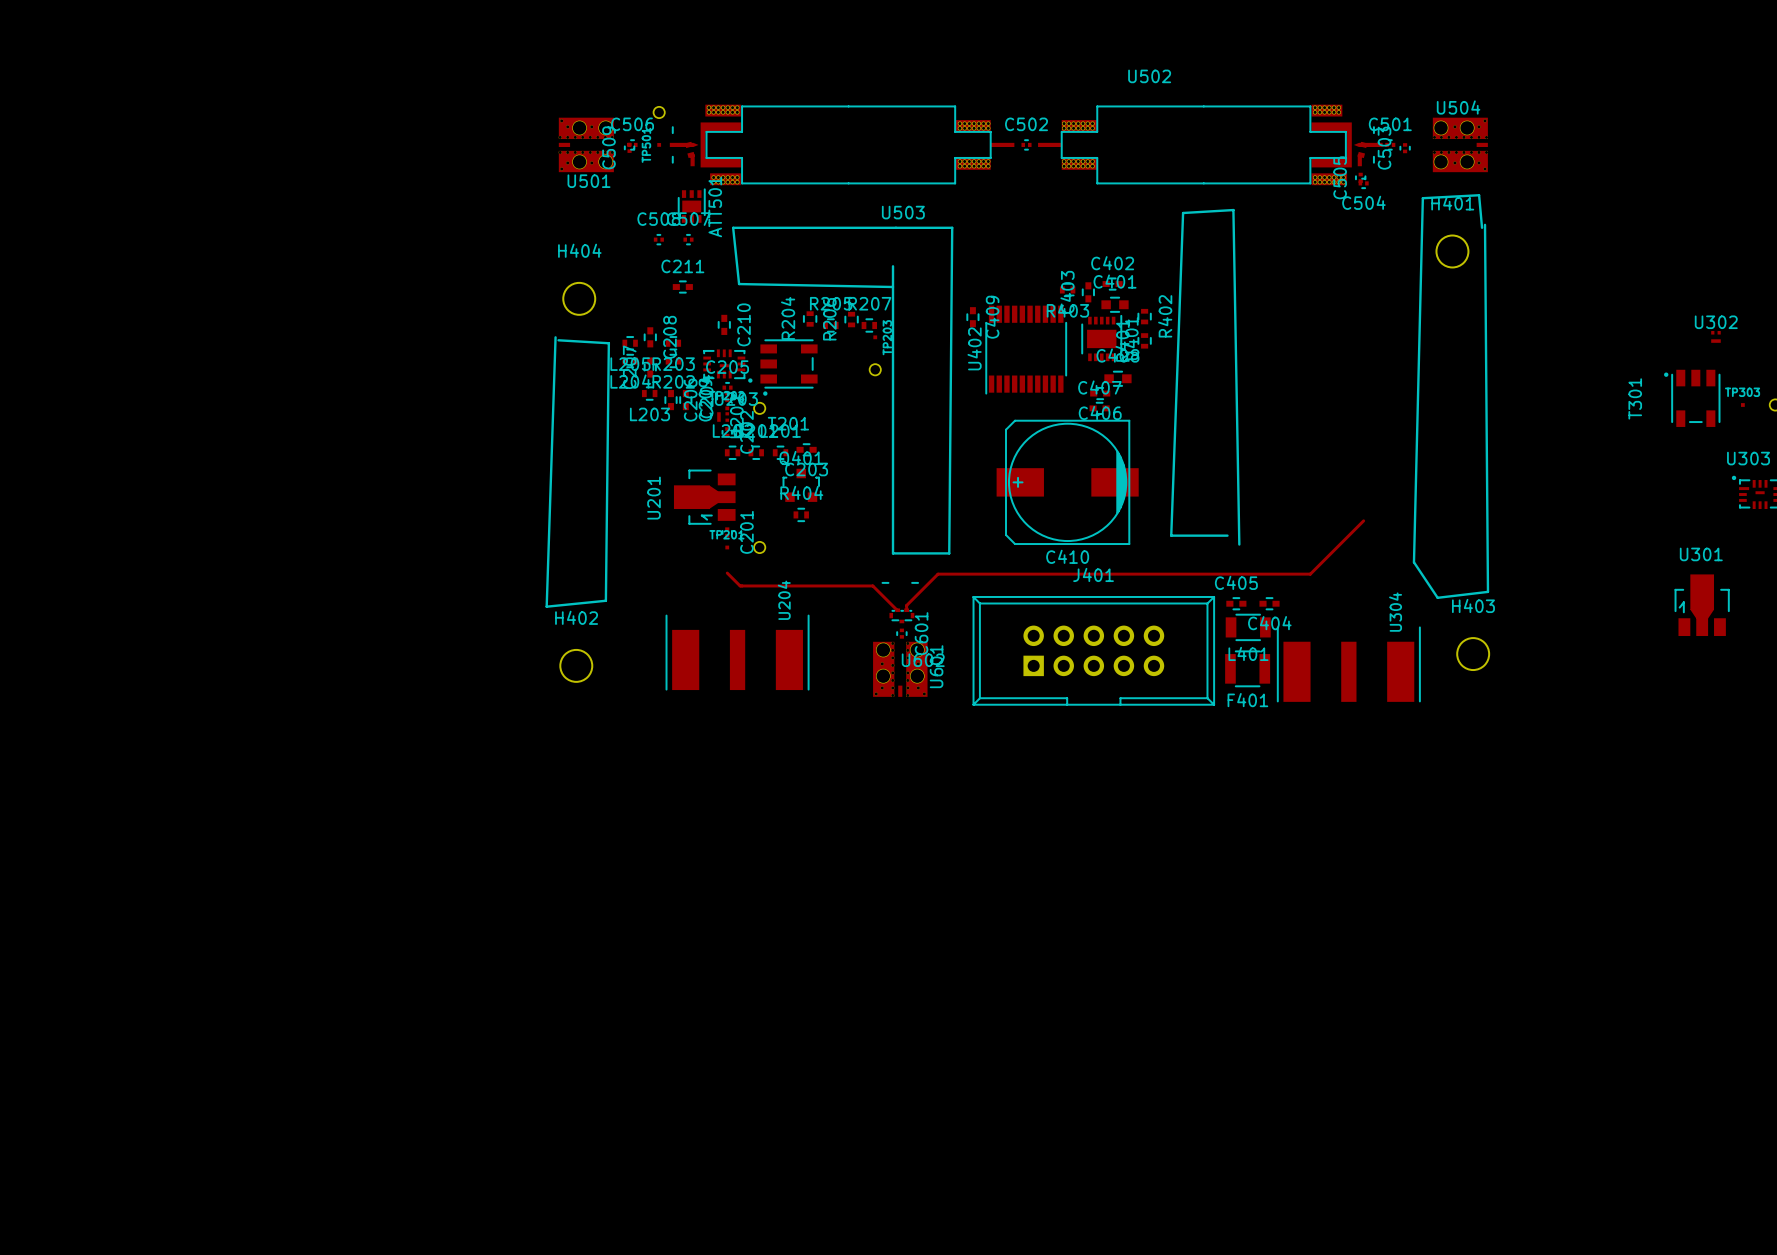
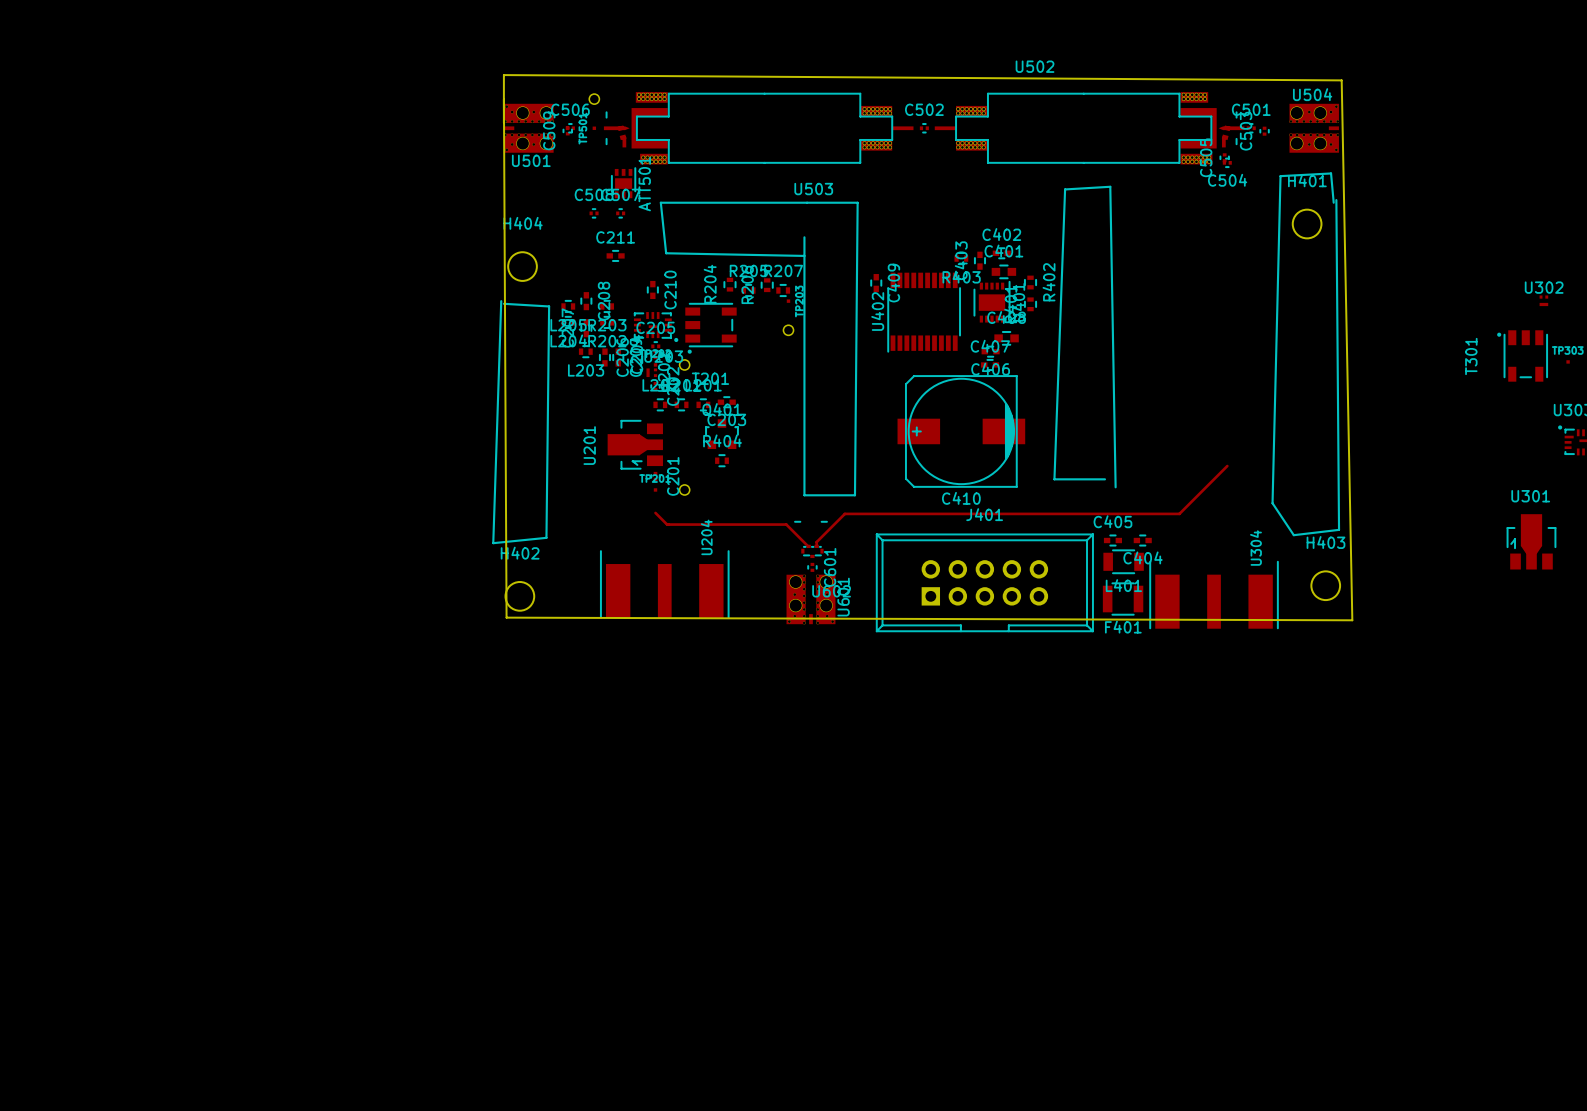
board edge: none -> (503, 99) (506, 617) (1352, 620) (1341, 80) (503, 75) (503, 122)

